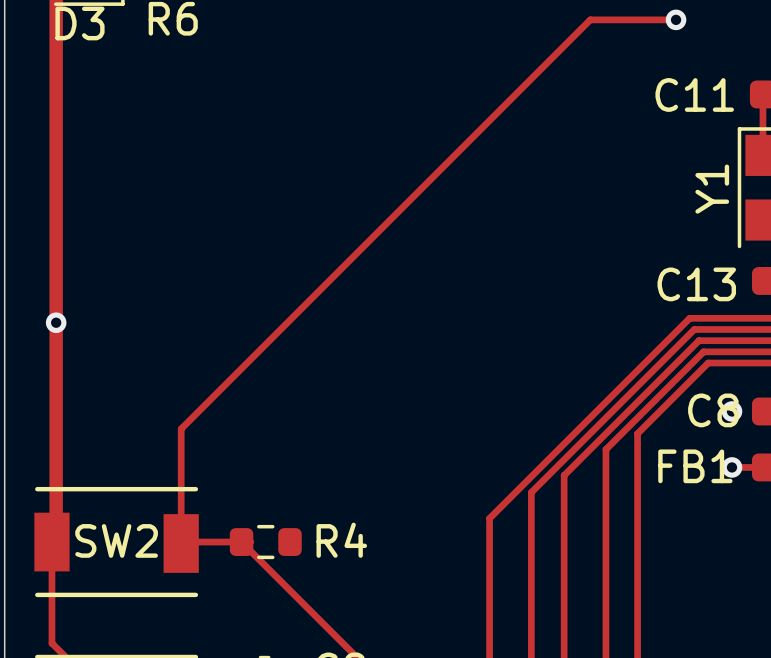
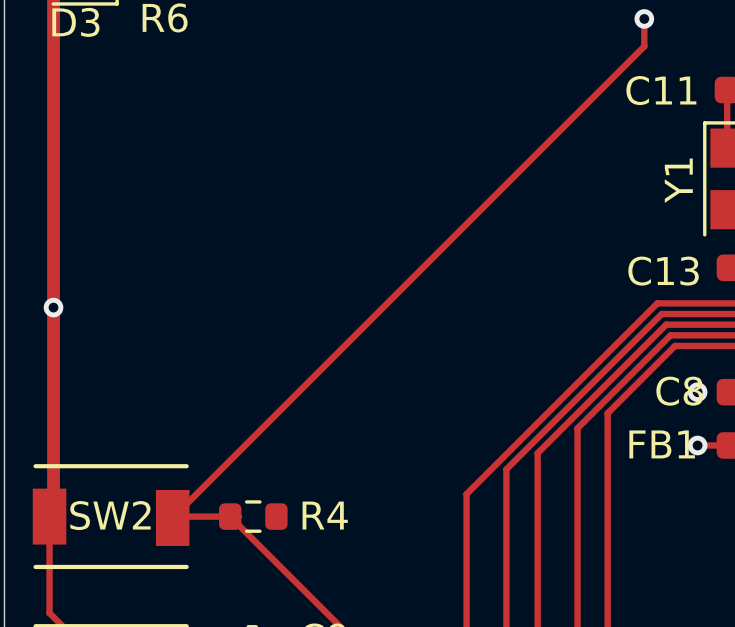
track: (676, 19) (590, 19) (181, 428) (181, 543) -> (644, 18) (644, 46) (172, 517)

